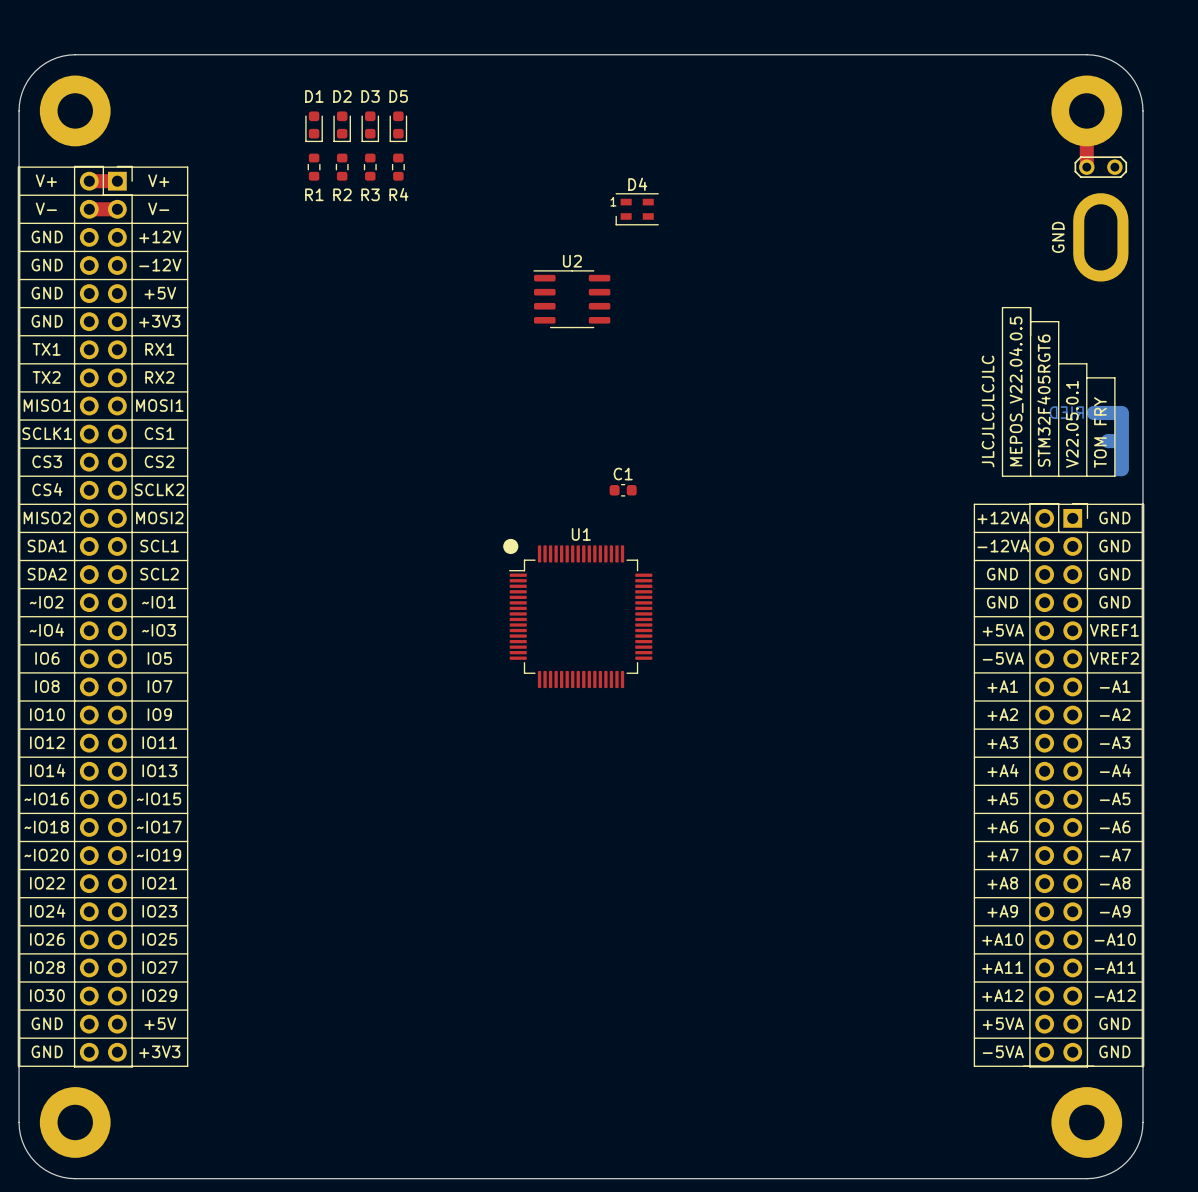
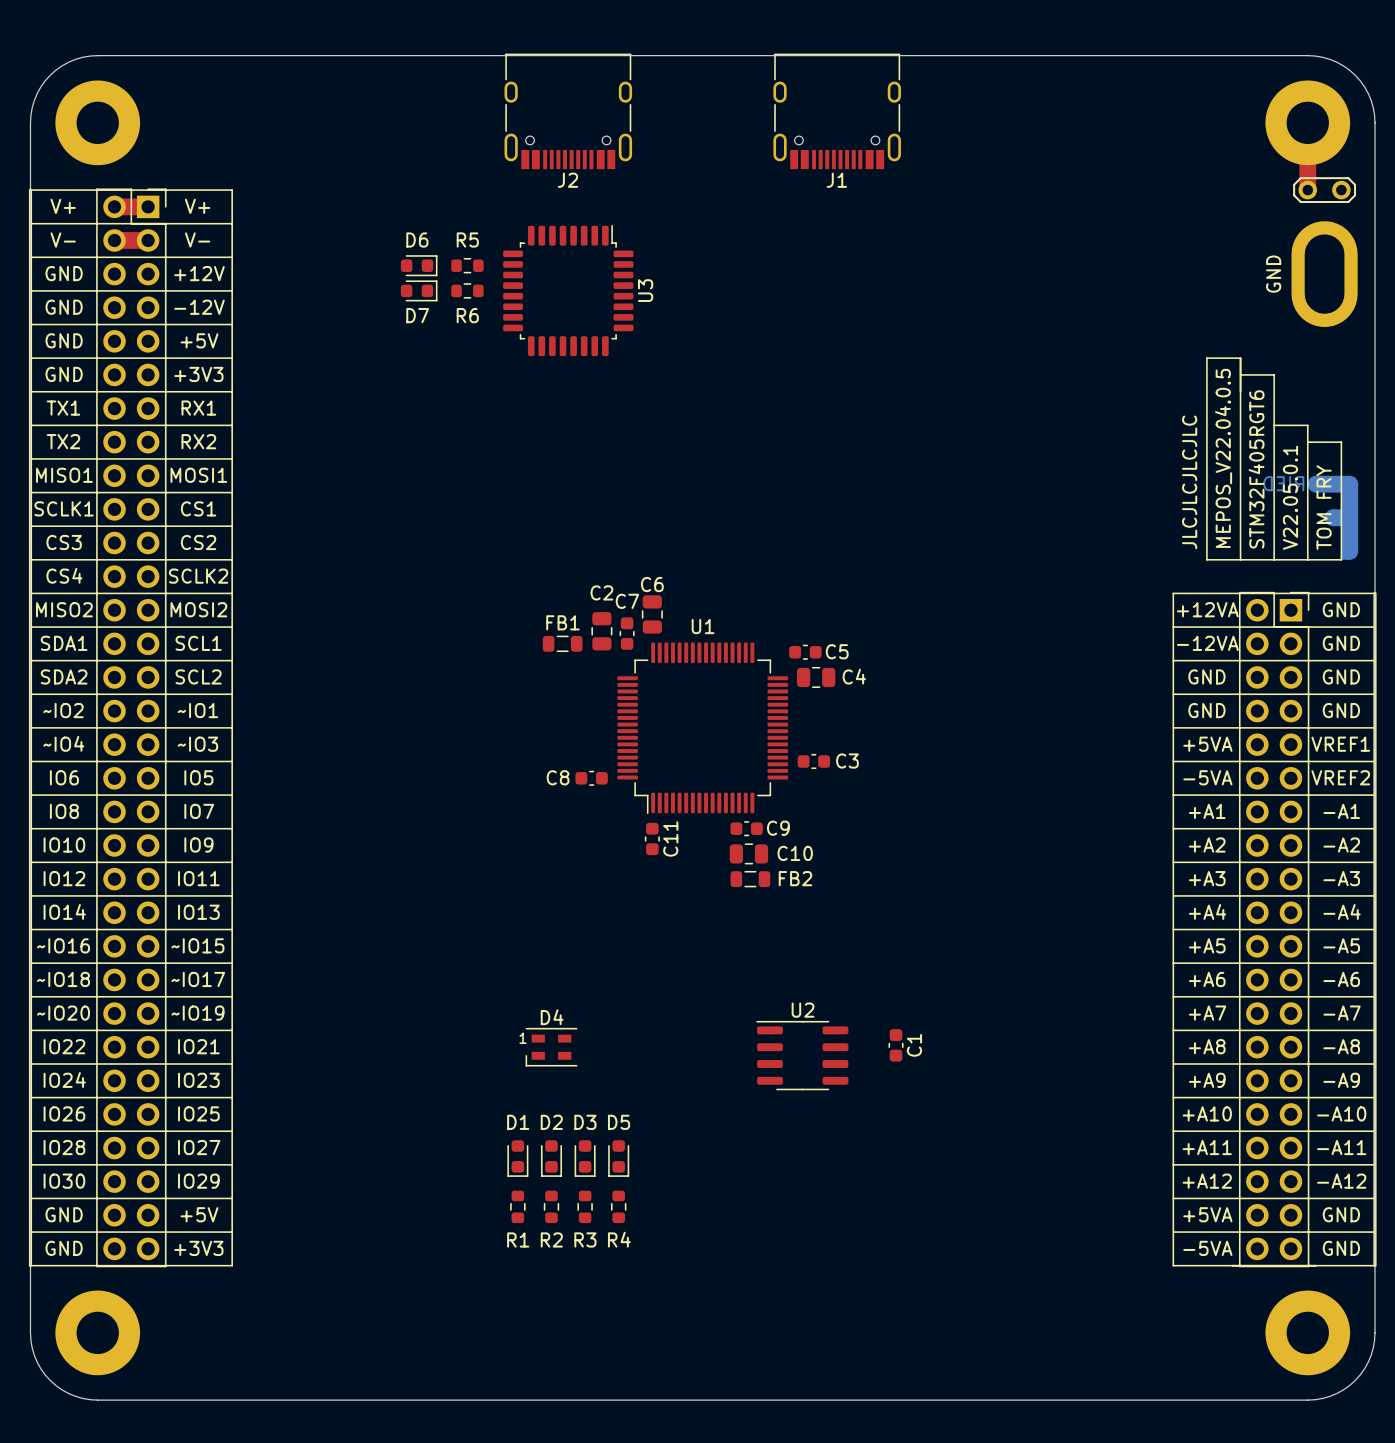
J2: none -> (568, 111)
J1: none -> (837, 111)
D1 position: (314, 126) -> (517, 1158)
D2 position: (342, 126) -> (551, 1158)
D3 position: (370, 126) -> (585, 1158)
D5 position: (398, 126) -> (618, 1158)
R1 position: (314, 167) -> (517, 1206)
R2 position: (342, 167) -> (551, 1206)
R3 position: (370, 167) -> (585, 1206)
R4 position: (398, 167) -> (618, 1206)
D4 position: (637, 209) -> (551, 1047)
D6: none -> (419, 265)
R5: none -> (467, 265)
D7: none -> (419, 290)
R6: none -> (467, 290)
U3: none -> (568, 290)
U2 position: (571, 299) -> (802, 1055)
C1 rotation: 0° (623, 490) -> 90° clockwise (896, 1045)
C1 position: (623, 490) -> (896, 1045)
C6: none -> (652, 614)
C2: none -> (601, 631)
C7: none -> (627, 633)
drawing: [503, 538, 519, 555] -> none
FB1: none -> (562, 643)
C5: none -> (805, 652)
C4: none -> (816, 677)
U1 rotation: 0° (580, 616) -> 90° counterclockwise (702, 728)
C3: none -> (813, 761)
C8: none -> (591, 778)
C9: none -> (746, 828)
C11: none -> (652, 838)
C10: none -> (748, 853)
FB2: none -> (750, 879)

